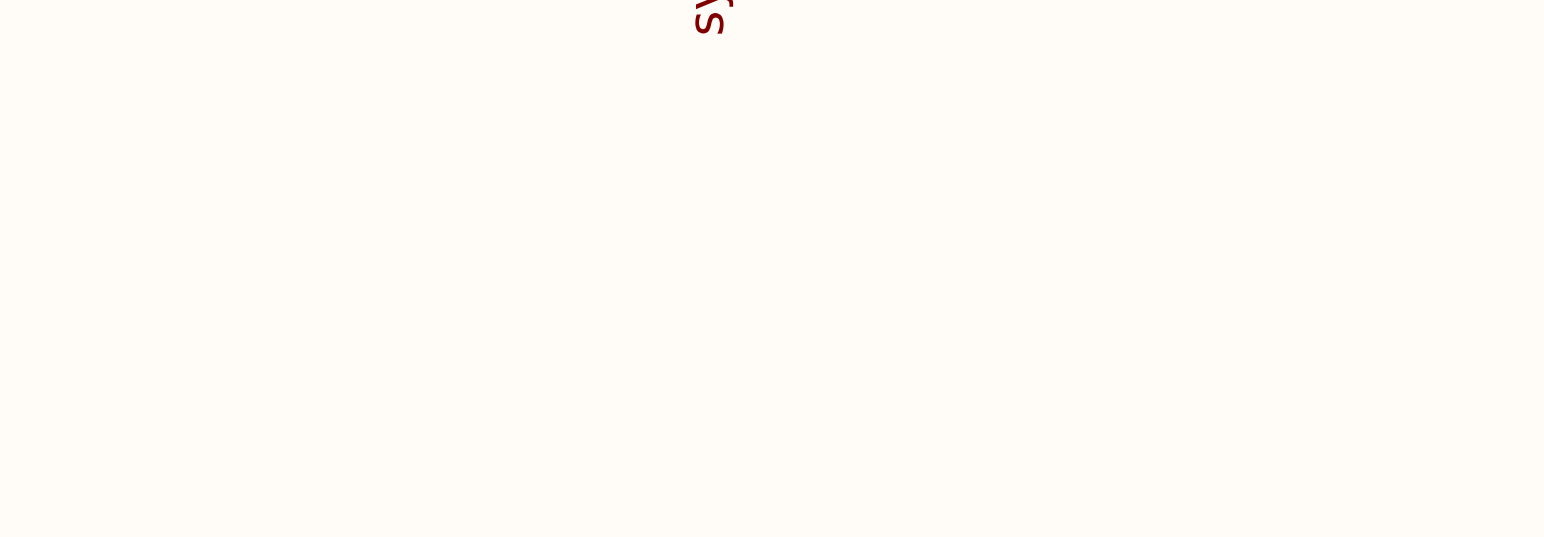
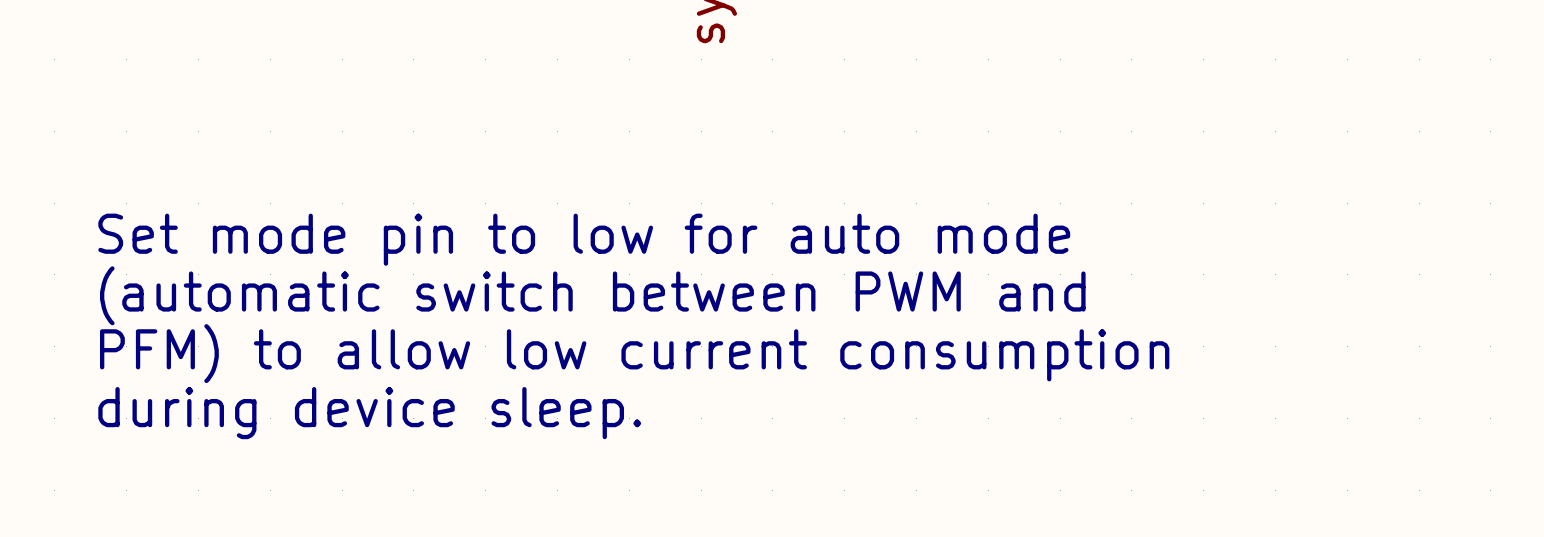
text: none -> Set mode pin to low for auto mode (584, 239)
text: none -> (automatic switch between PWM and (592, 295)
text: none -> PFM) to allow low current consumption (634, 353)
text: none -> during device sleep. (369, 413)

